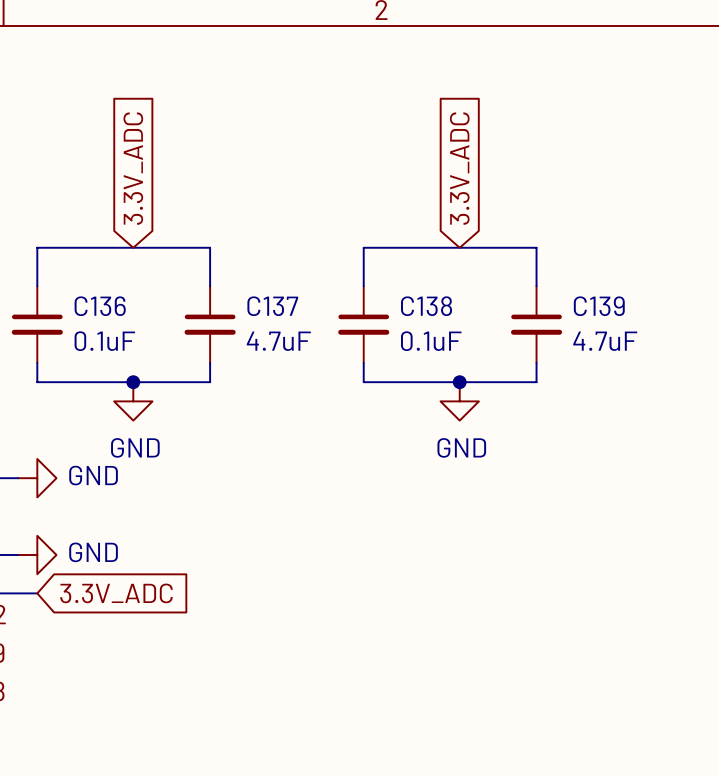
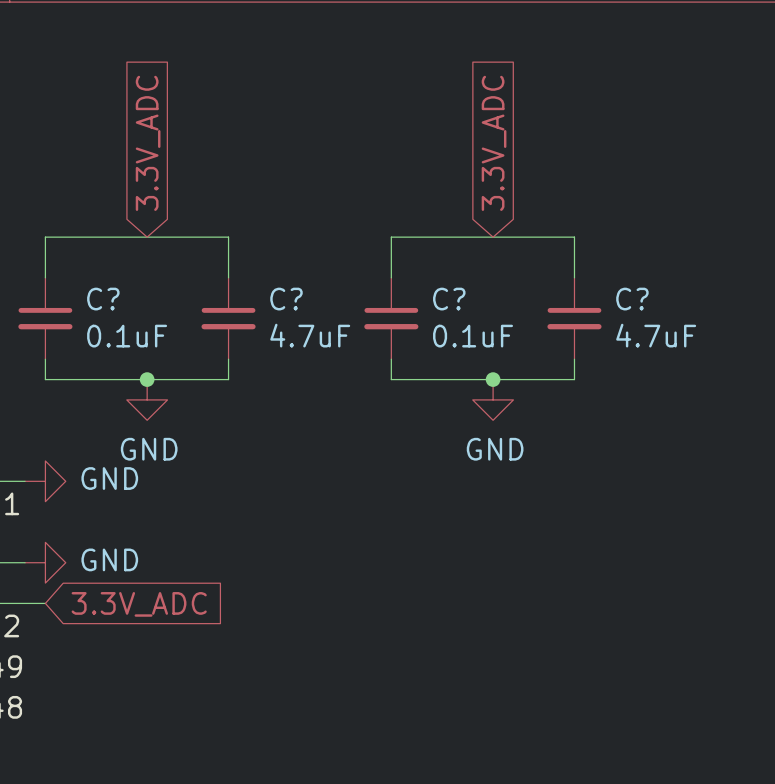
C136 name: C136 (100, 306) -> C? (103, 299)
C137 name: C137 (272, 306) -> C? (286, 299)
C138 name: C138 (426, 306) -> C? (449, 299)
C139 name: C139 (599, 306) -> C? (632, 299)

